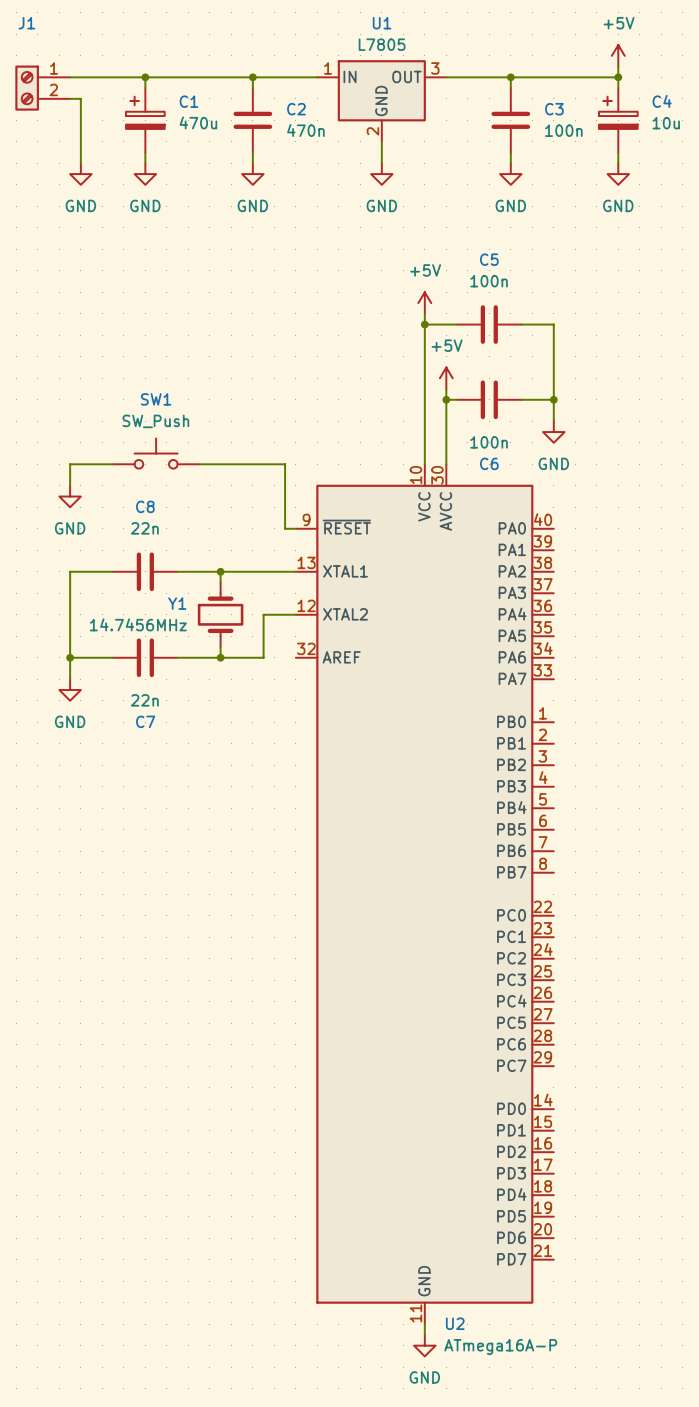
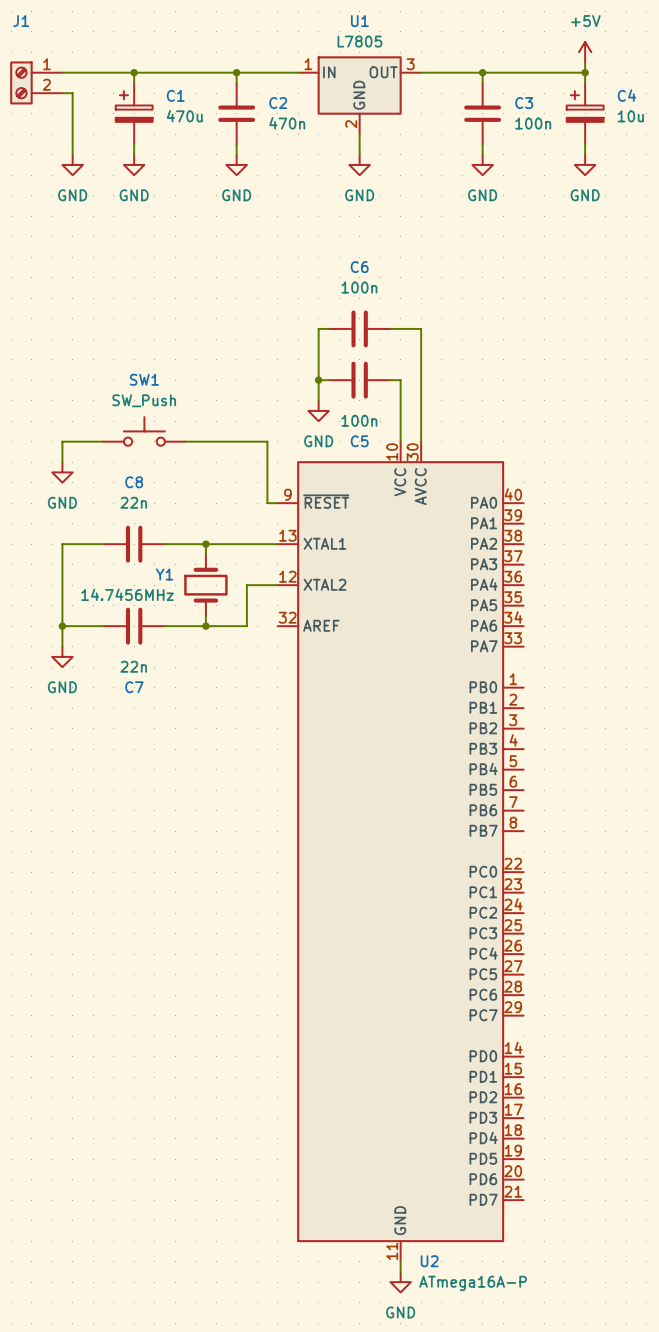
C5 name position: C5 (489, 259) -> C5 (359, 441)
C5 value position: 100n (489, 281) -> 100n (359, 420)
power symbol: +5V (424, 303) -> none
wire: (424, 313) (424, 399) -> (390, 380) (400, 380)
wire: (424, 324) (457, 324) -> none
junction: (424, 324) -> none
C5 position: (489, 324) -> (359, 380)
wire: (521, 324) (553, 324) (553, 421) -> none
wire: none -> (328, 328) (318, 328) (318, 400)
wire: none -> (390, 328) (421, 328) (421, 369)
power symbol: +5V (446, 378) -> none
junction: none -> (318, 380)
wire: (446, 399) (457, 399) -> (318, 380) (328, 380)
junction: (446, 399) -> none
C6 position: (489, 399) -> (359, 328)
wire: (521, 399) (553, 399) -> none
junction: (553, 399) -> none
power symbol: none -> GND (318, 410)
power symbol: GND (553, 432) -> none
C6 value position: 100n (489, 442) -> 100n (359, 287)
C6 name position: C6 (489, 463) -> C6 (359, 267)

